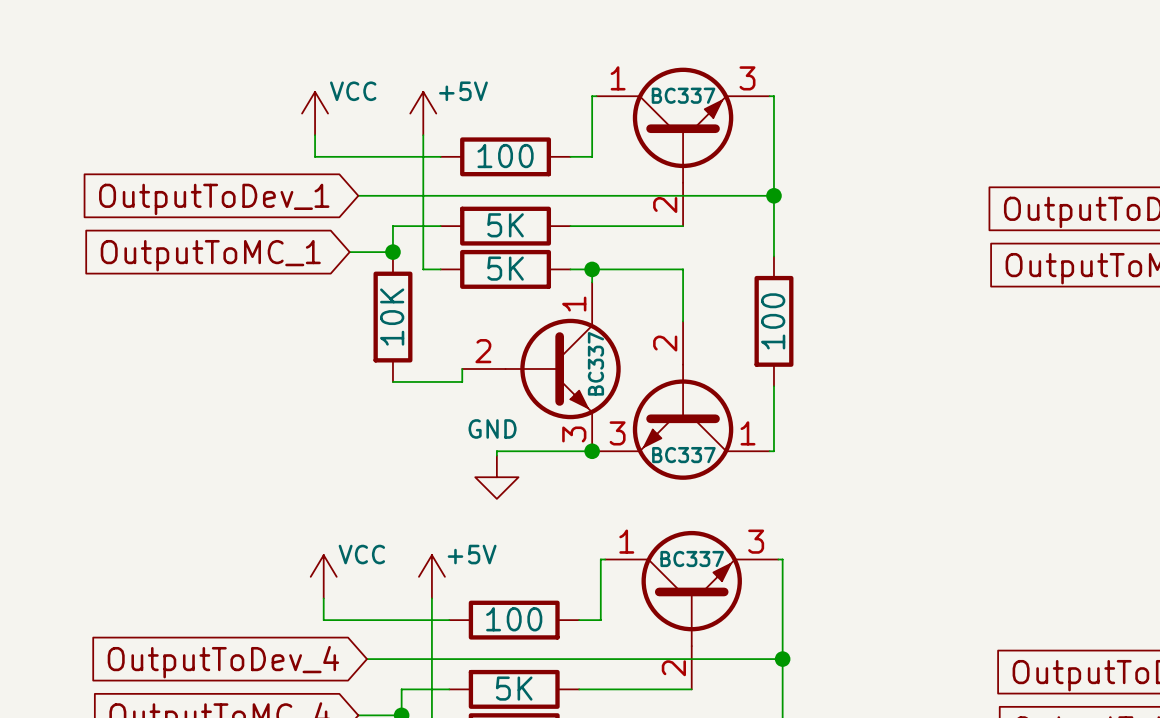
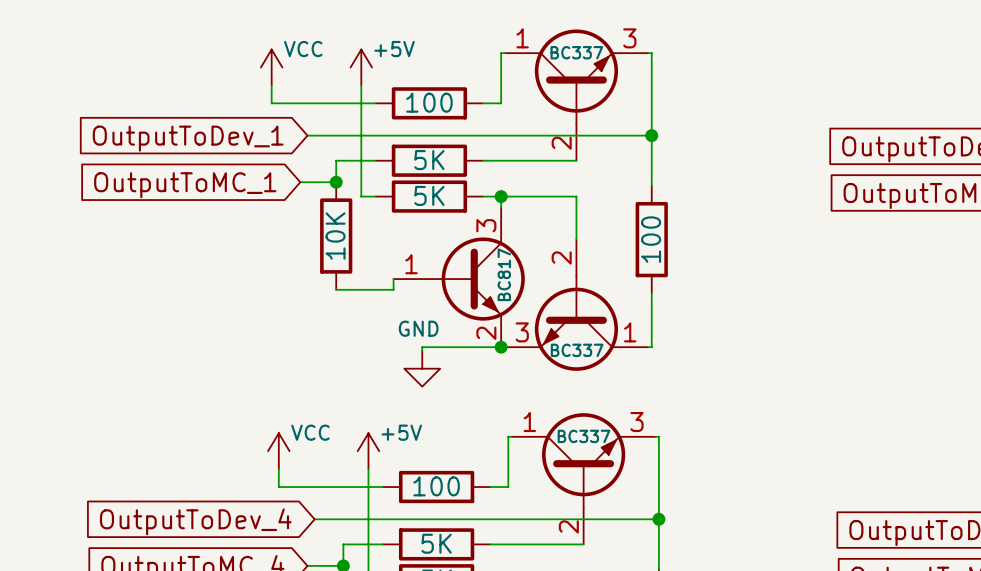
part pin number: 1 (574, 304) -> 3 (486, 225)
part pin number: 2 (483, 351) -> 1 (411, 264)
part value: BC337 (595, 363) -> BC817 (504, 274)
part pin number: 3 (574, 434) -> 2 (486, 333)

